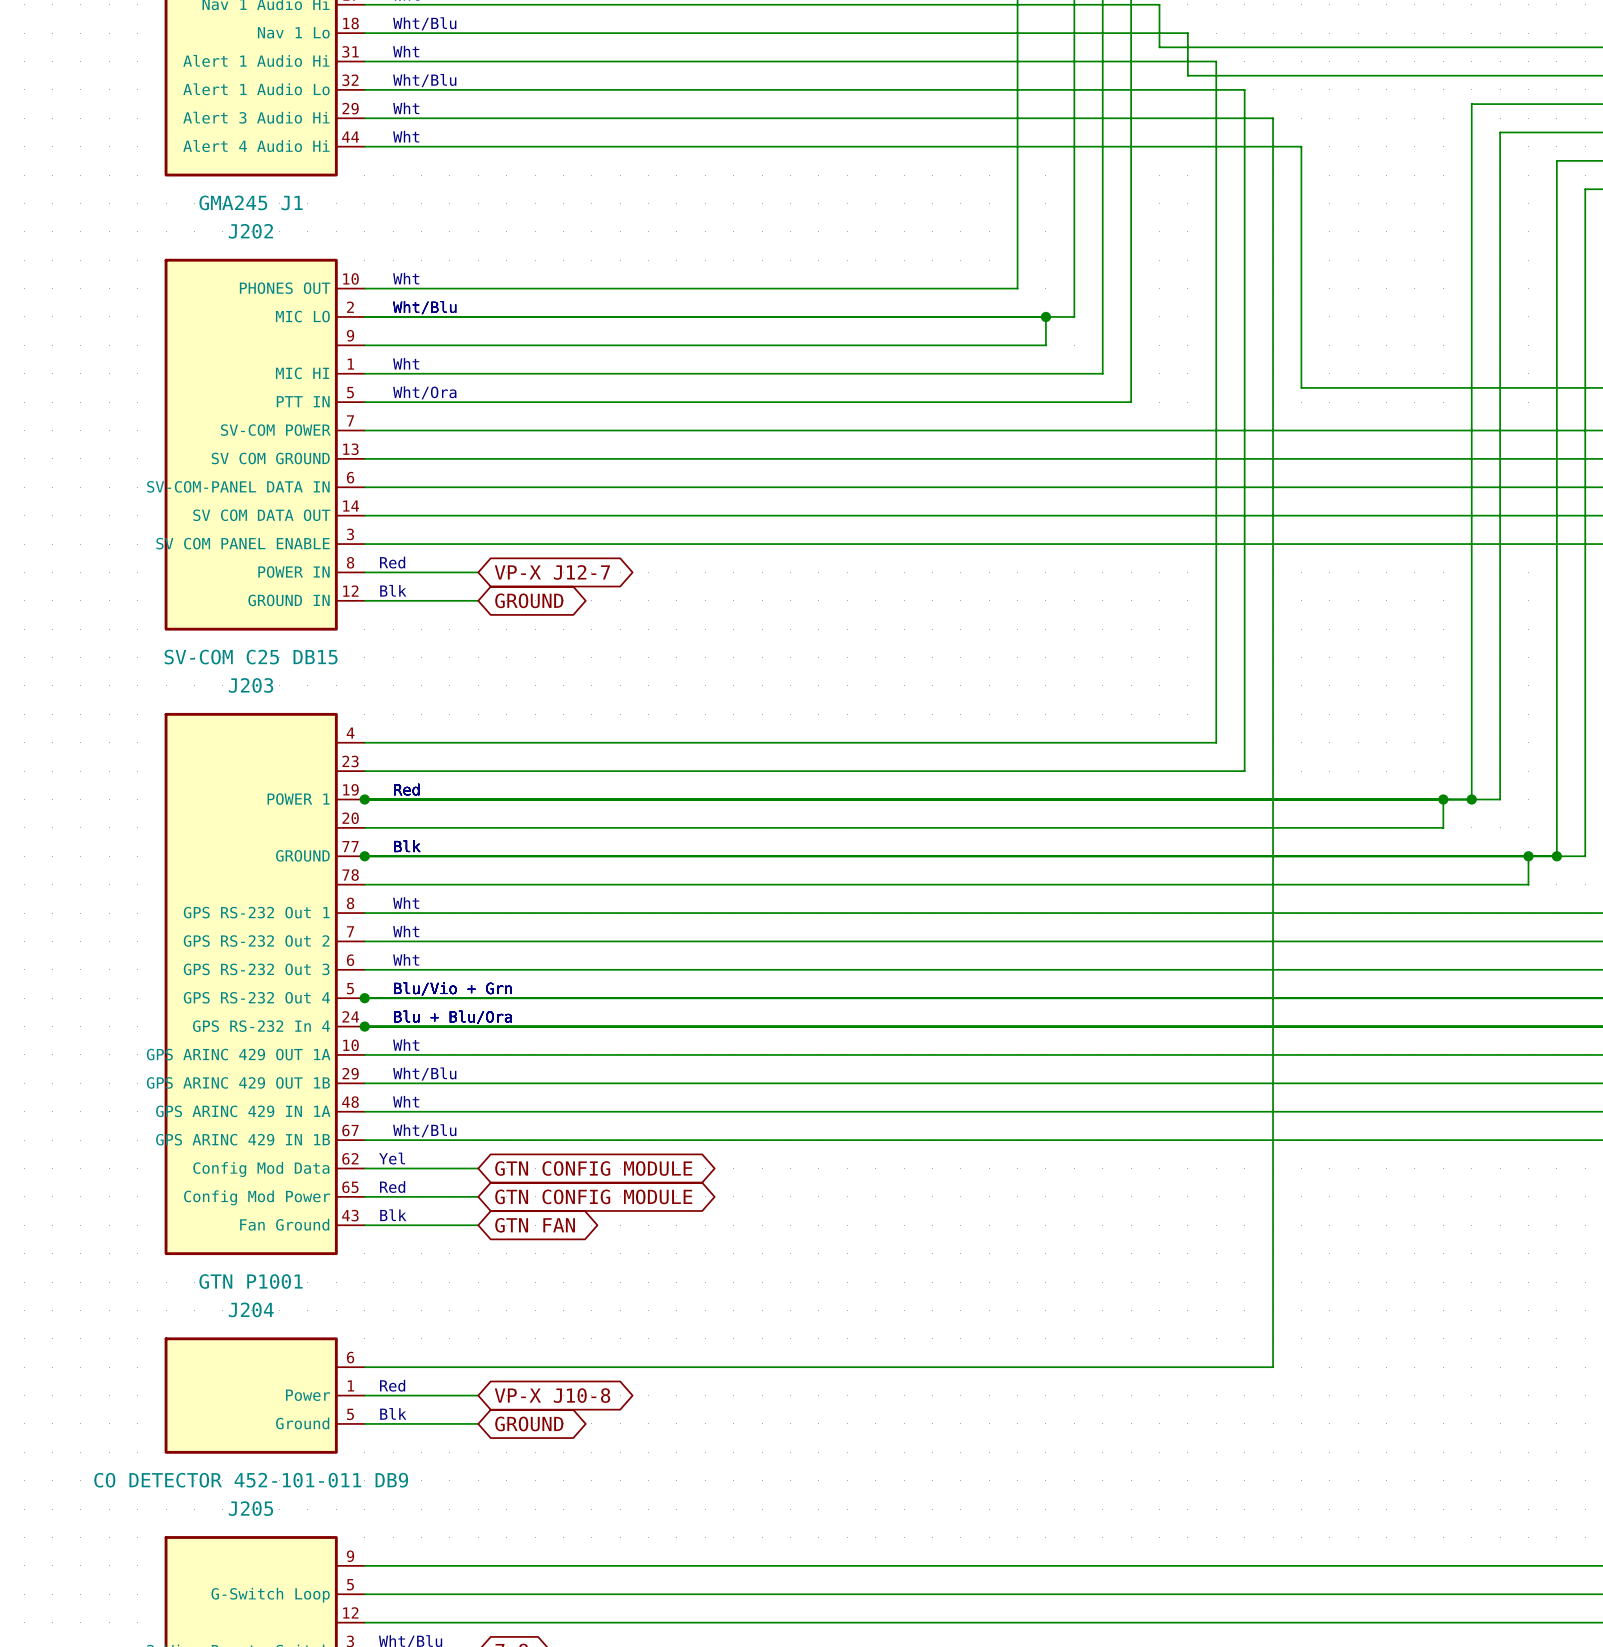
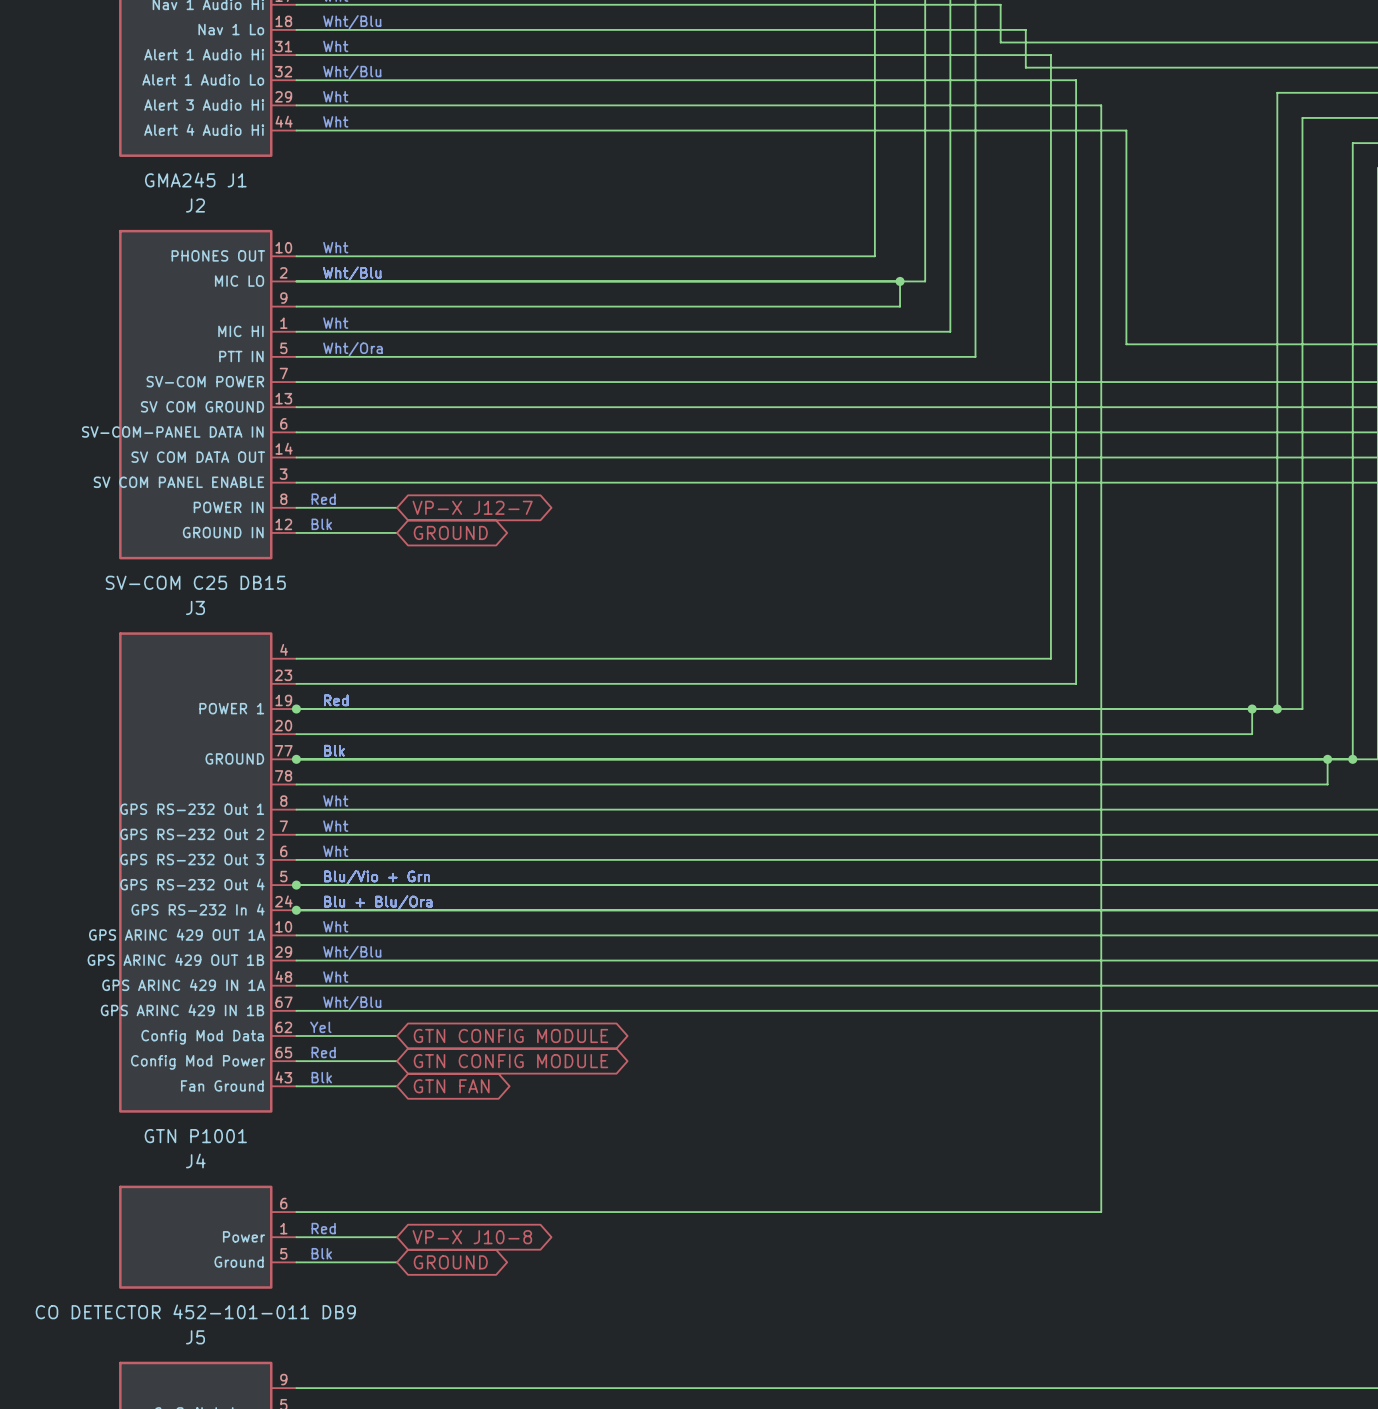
J202 name: J202 (250, 231) -> J2 (195, 205)
J203 name: J203 (250, 685) -> J3 (195, 607)
J204 name: J204 (251, 1309) -> J4 (195, 1160)
J205 name: J205 (250, 1508) -> J5 (195, 1337)

